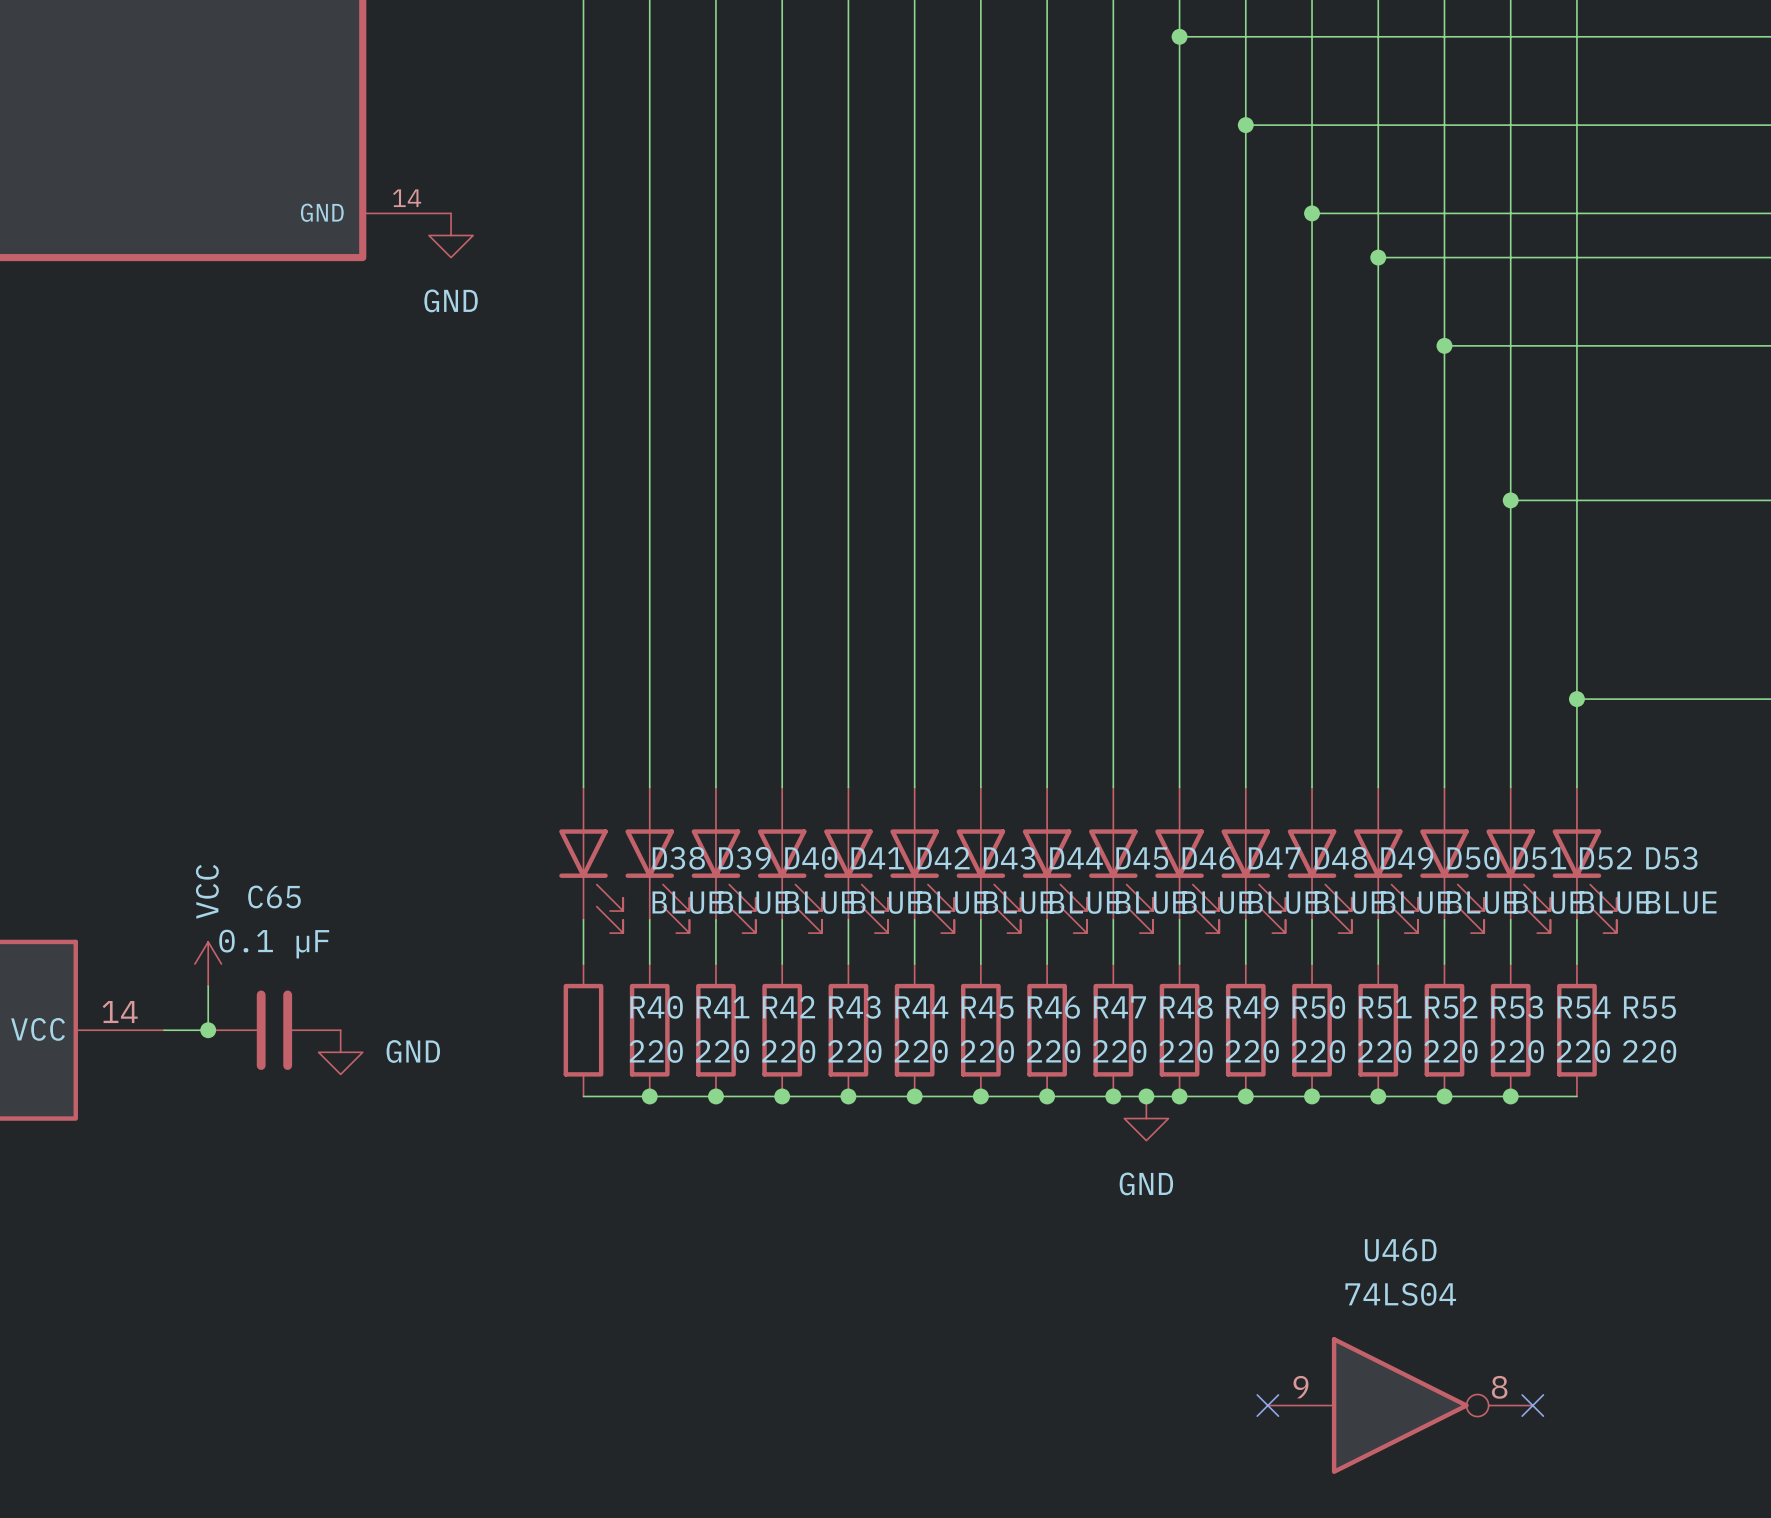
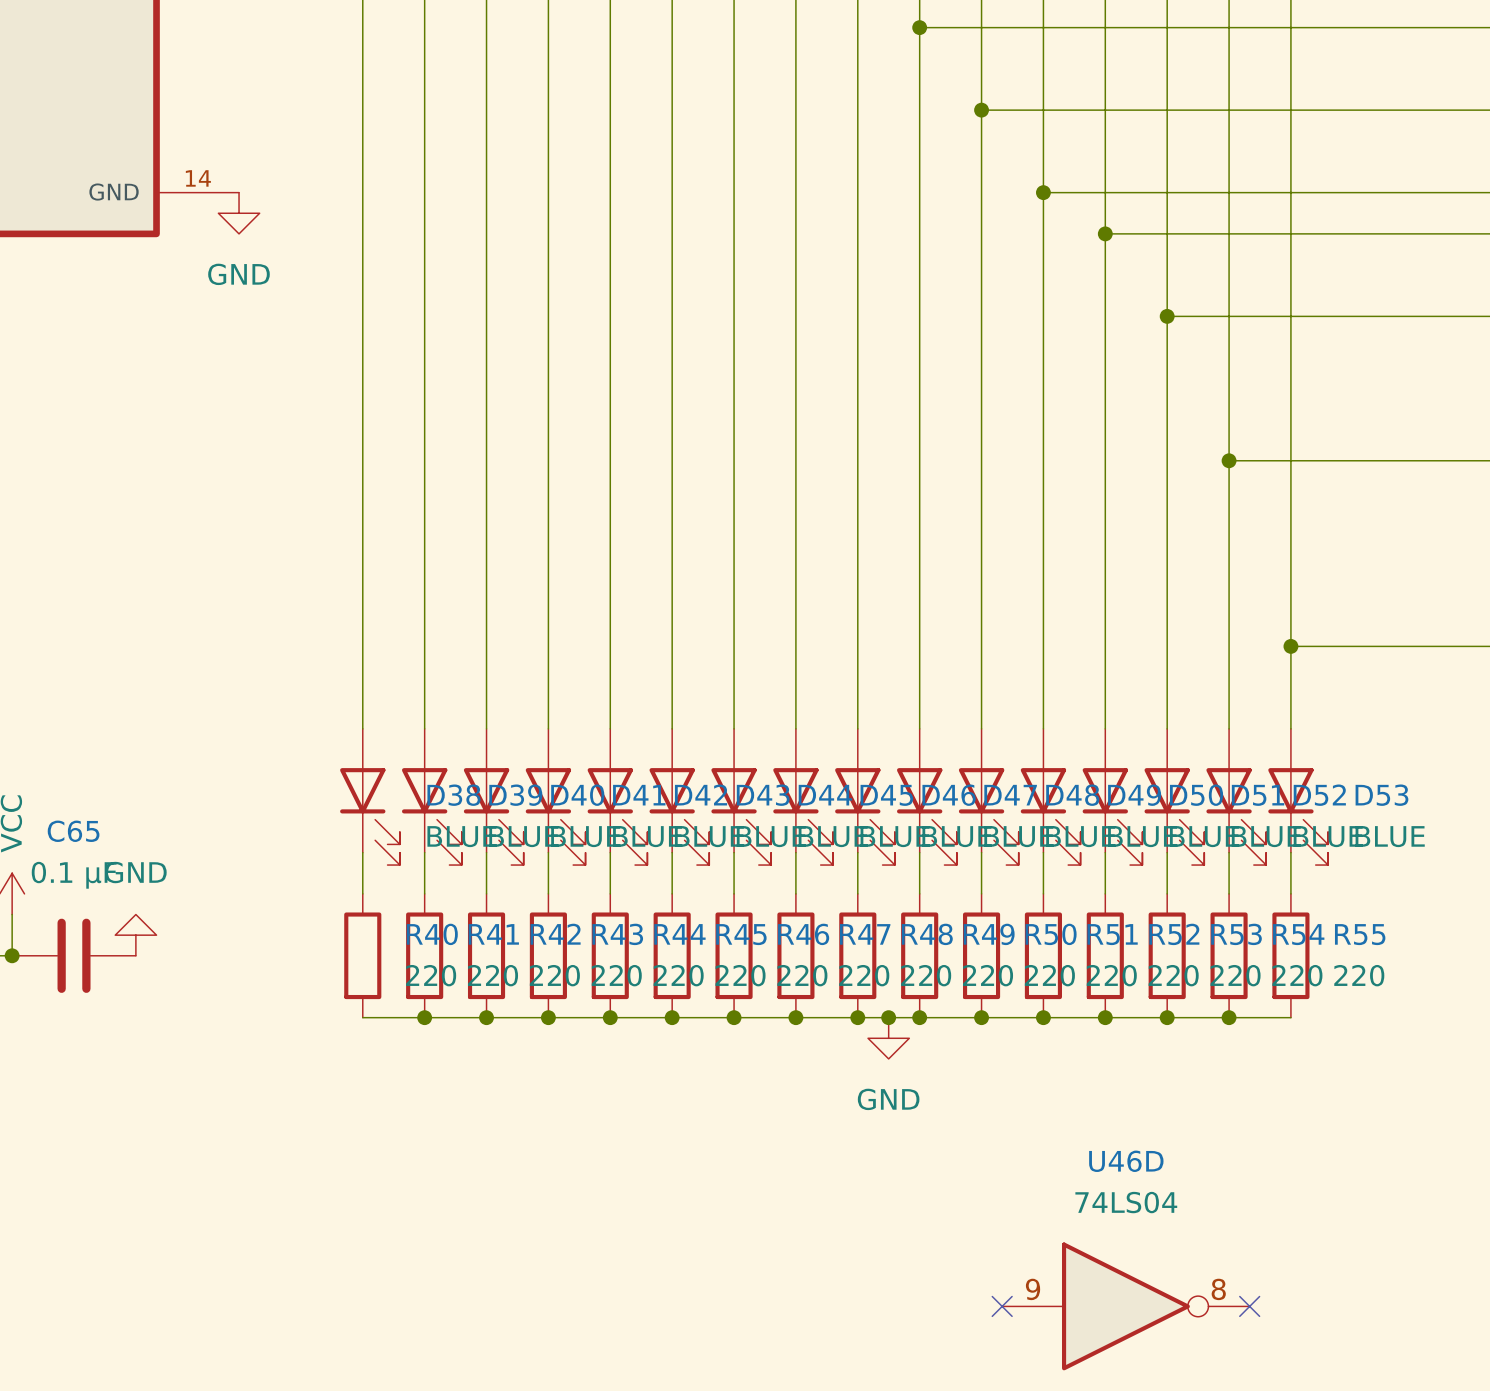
power symbol text position: GND (413, 1051) -> GND (135, 872)
power symbol rotation: 0° (340, 1052) -> 180° (135, 935)
power symbol position: GND (340, 1052) -> GND (135, 935)

